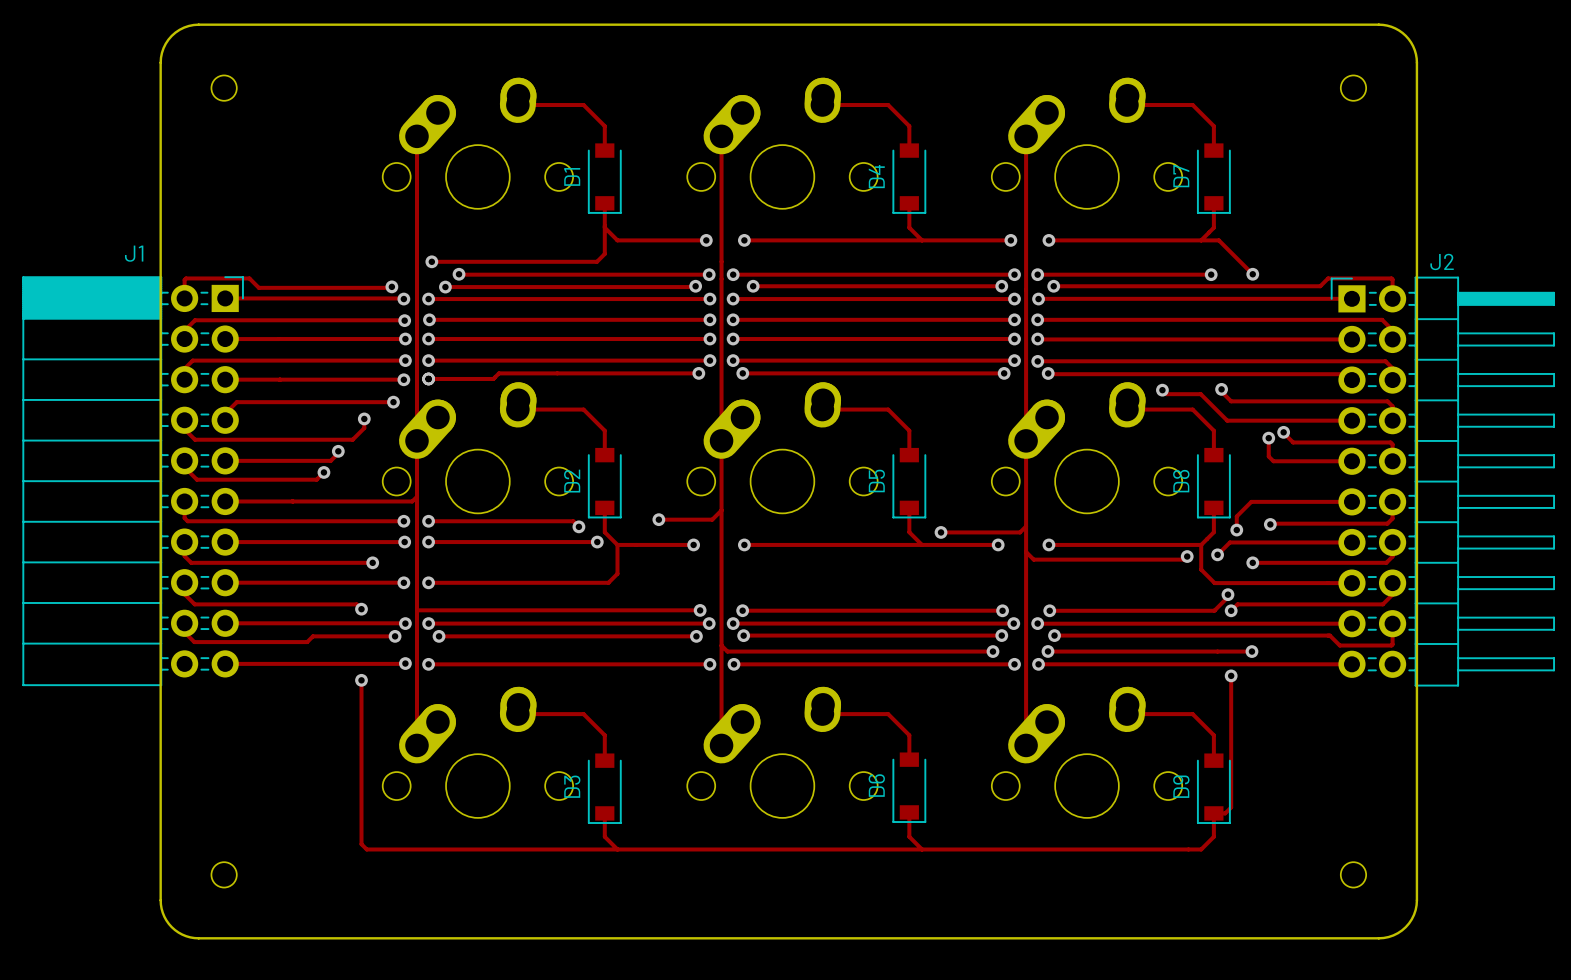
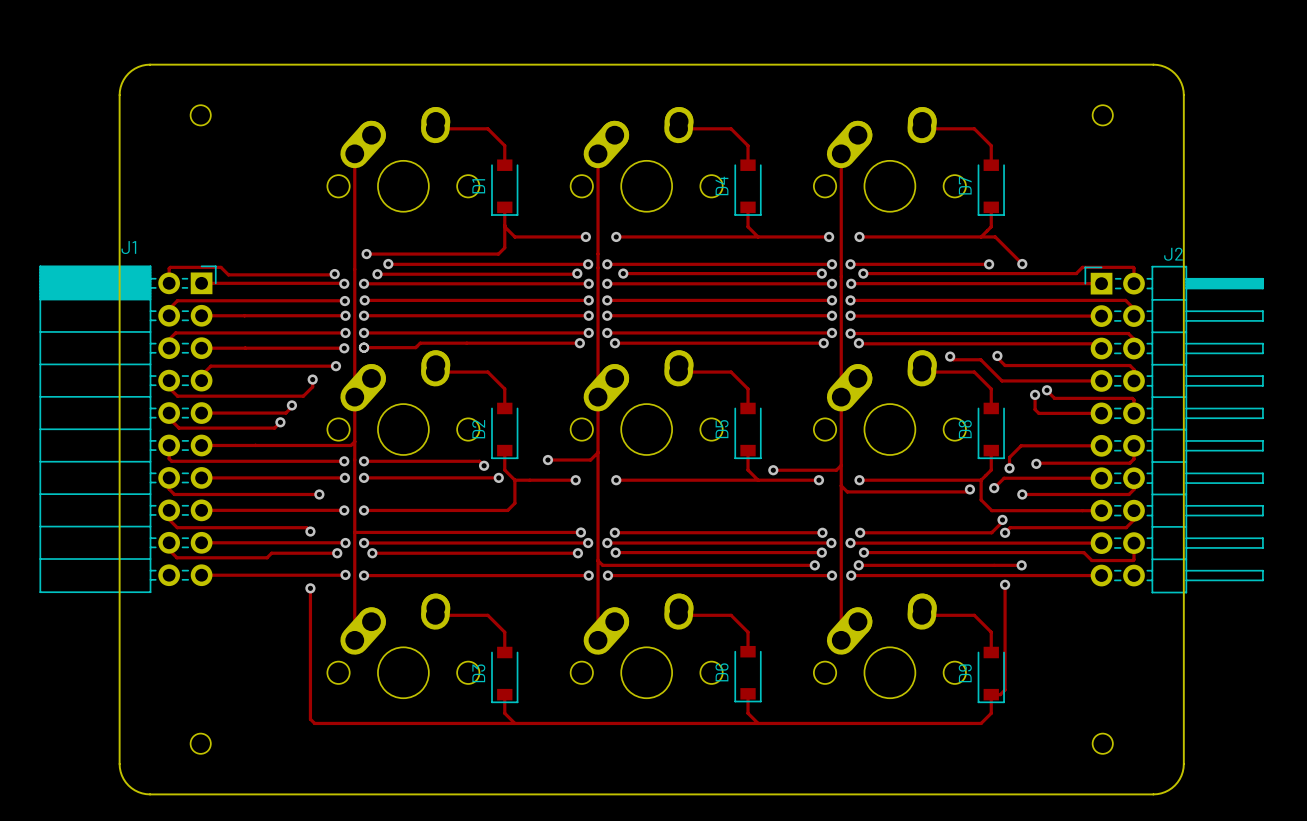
board edge: (198, 24) (184, 27) (171, 35) (163, 48) (160, 62) (160, 900) (164, 916) (171, 927) (182, 934) (198, 938) -> (180, 64) (146, 64) (134, 68) (123, 79) (119, 95) (119, 767) (125, 782) (138, 792) (150, 794) (180, 794)
board edge: (1378, 24) (1391, 26) (1405, 35) (1414, 50) (1416, 62) (1416, 900) (1414, 914) (1405, 927) (1393, 935) (1378, 938) -> (1123, 64) (1157, 64) (1168, 68) (1179, 79) (1183, 95) (1183, 767) (1177, 782) (1165, 792) (1153, 794) (1123, 794)

